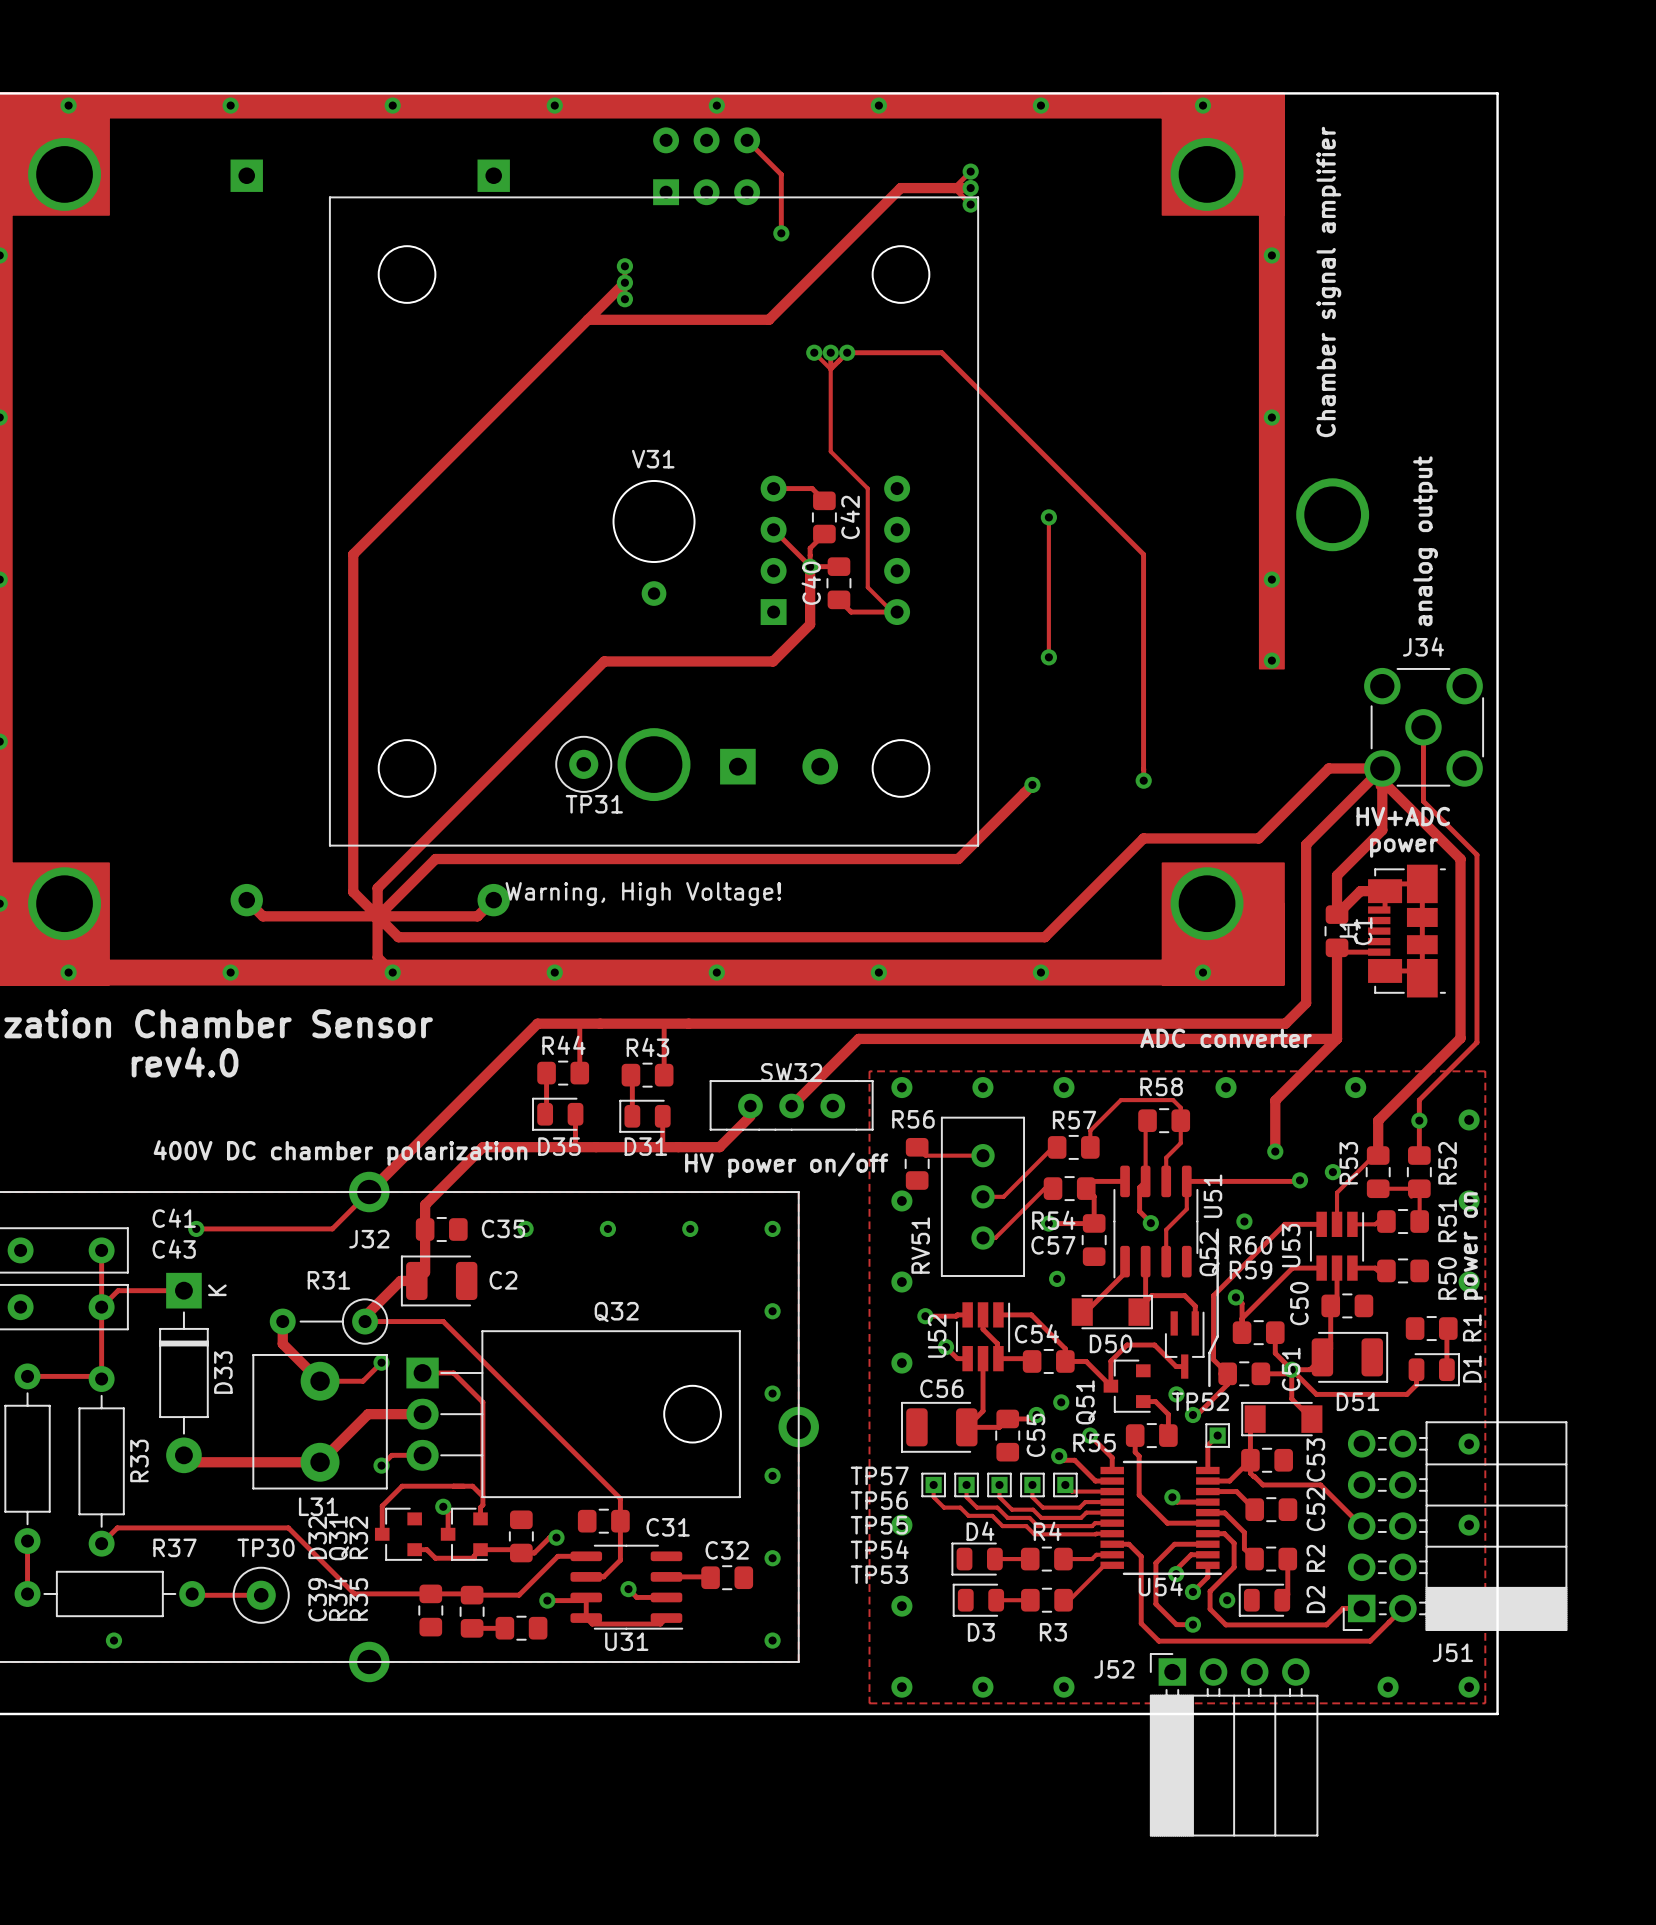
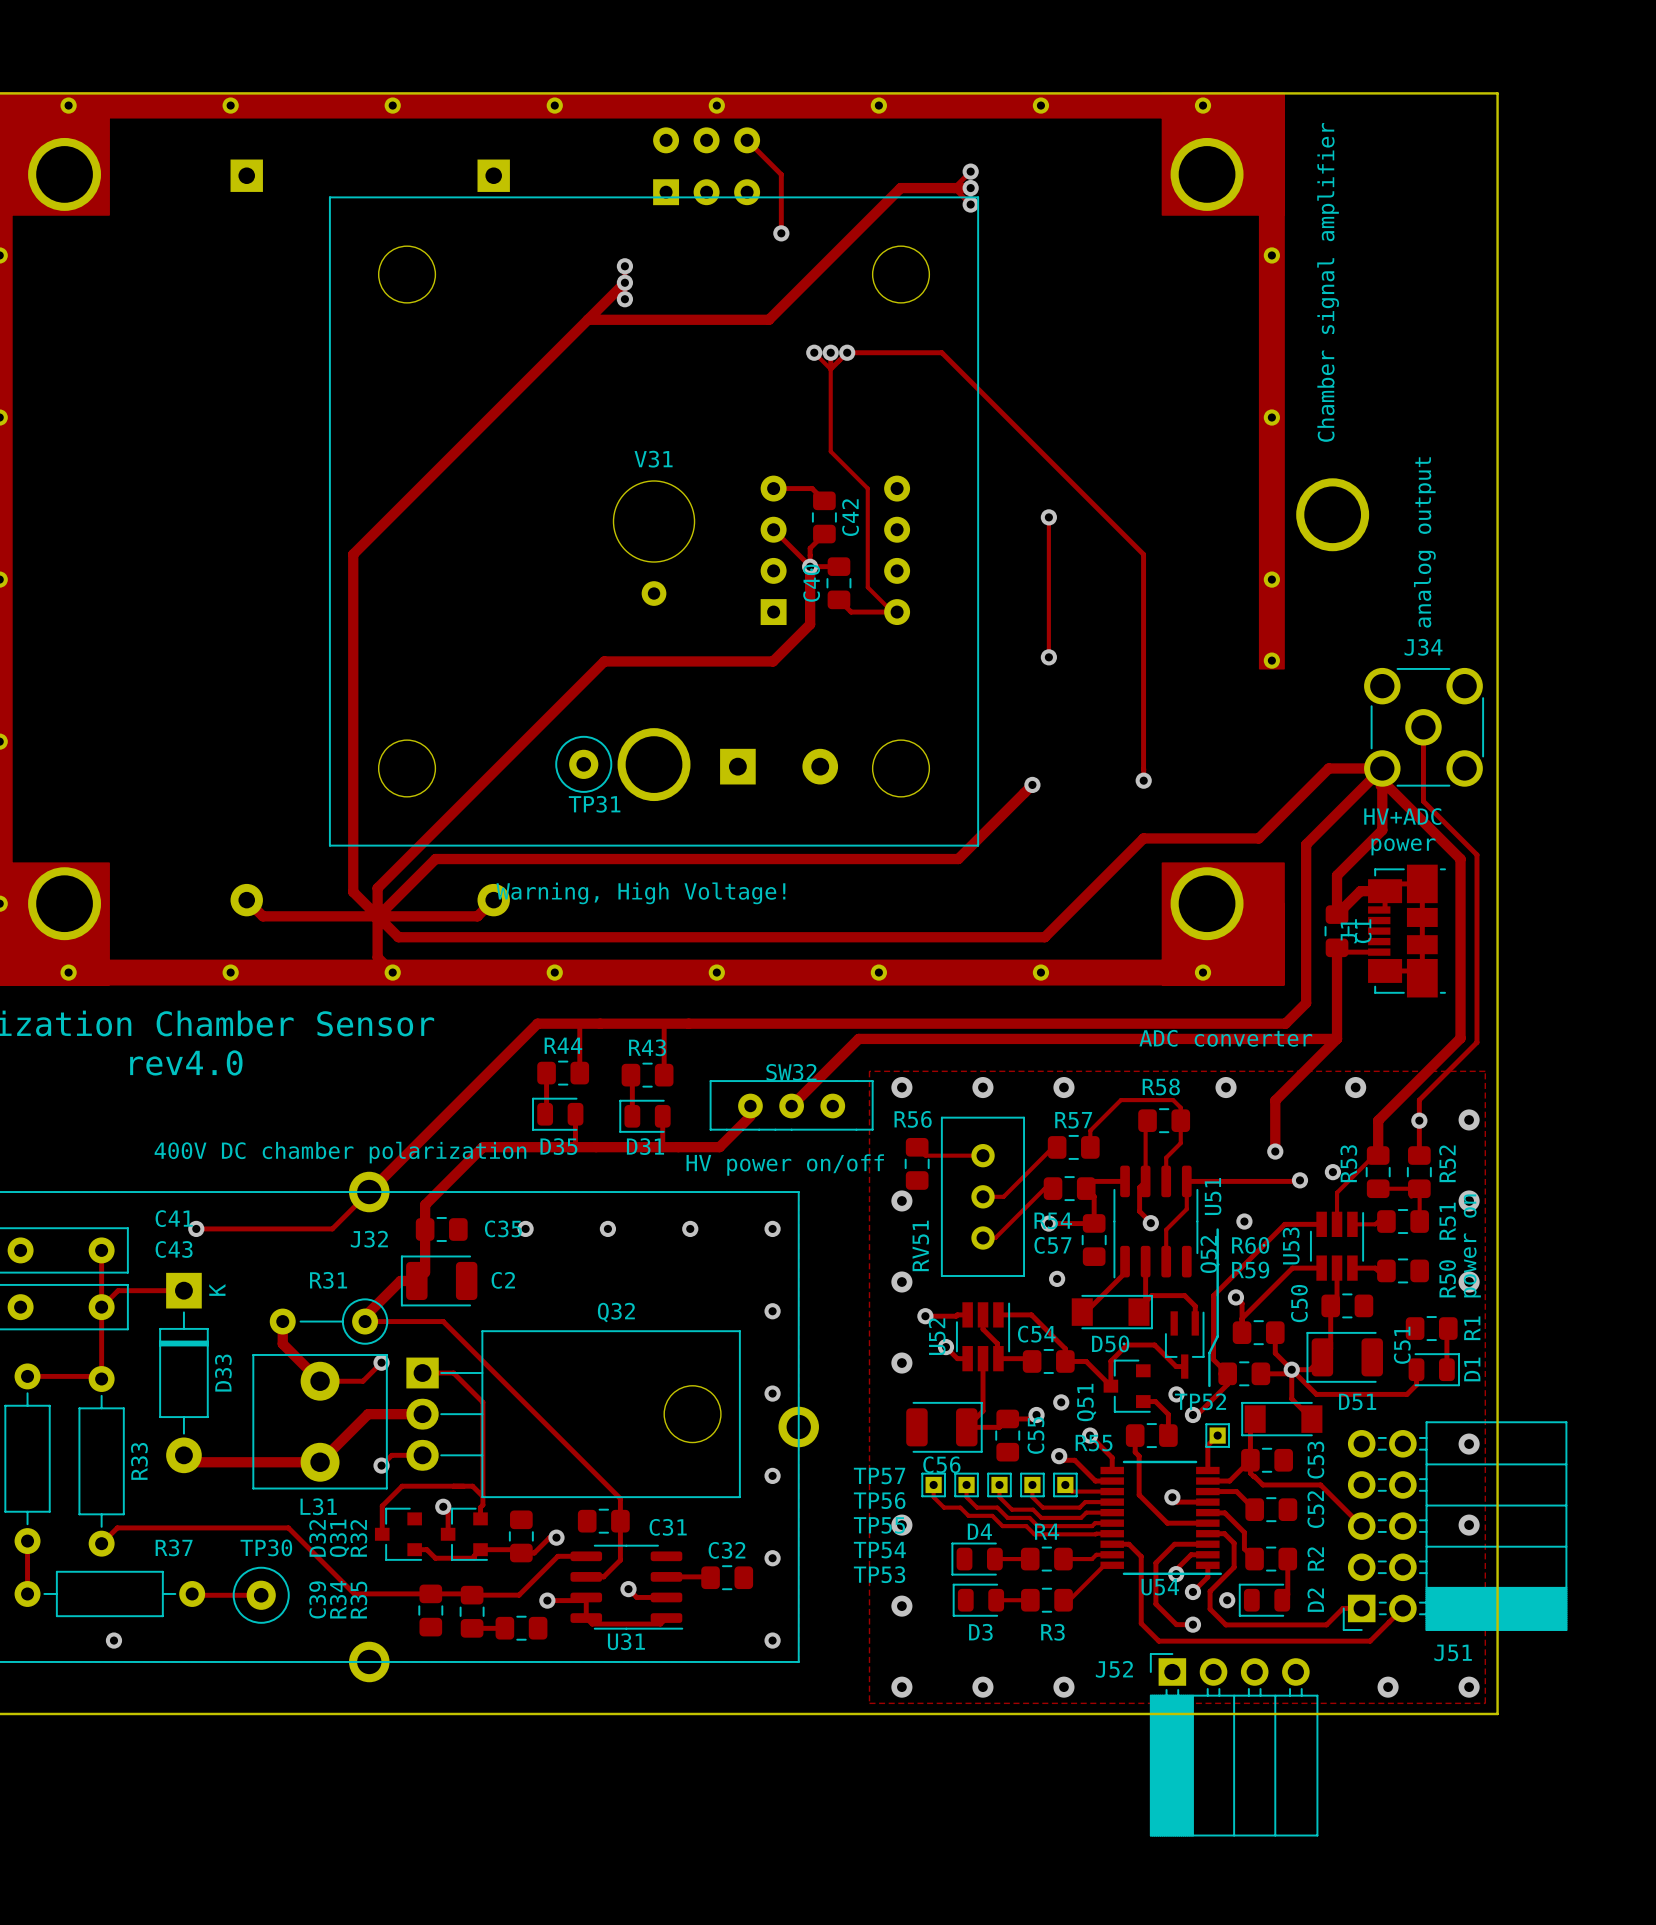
C51 rotation: 0° (1349, 1357) -> 180° (1344, 1357)
C56 rotation: 0° (939, 1427) -> 180° (944, 1427)

